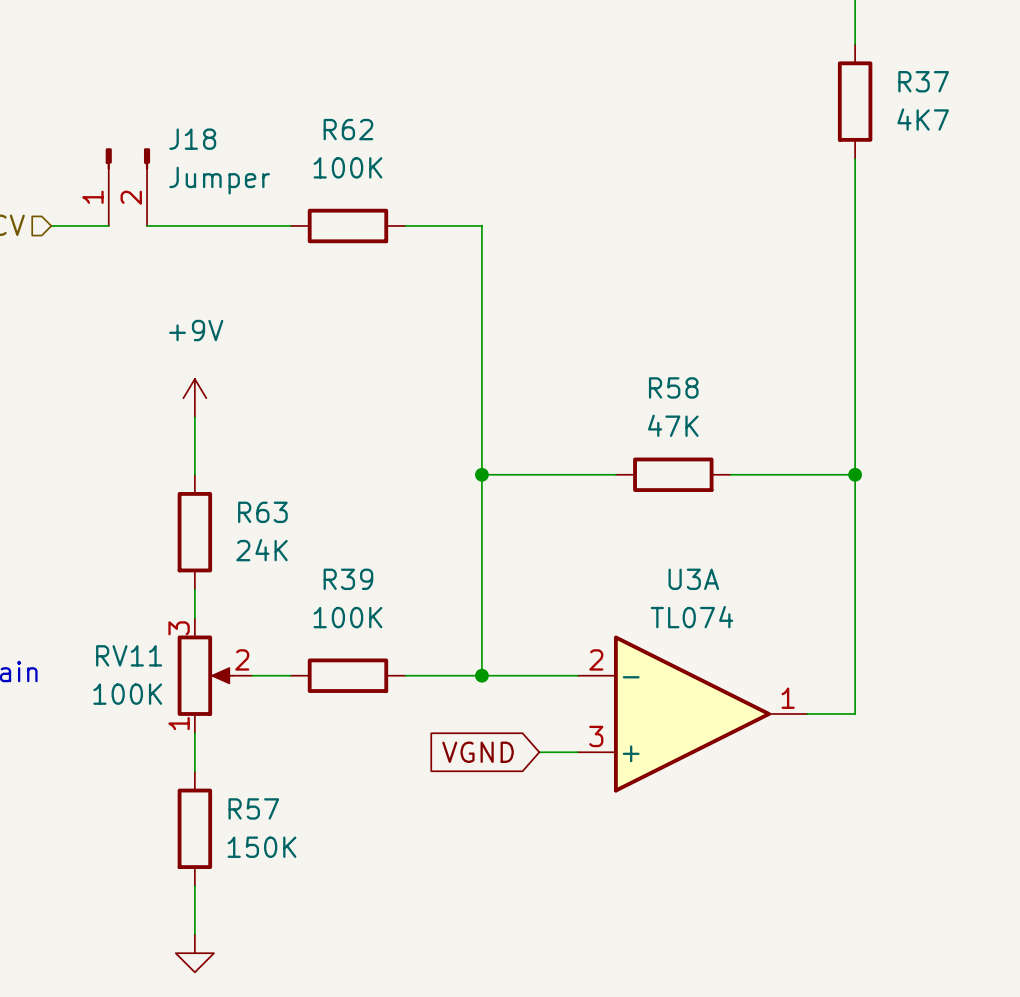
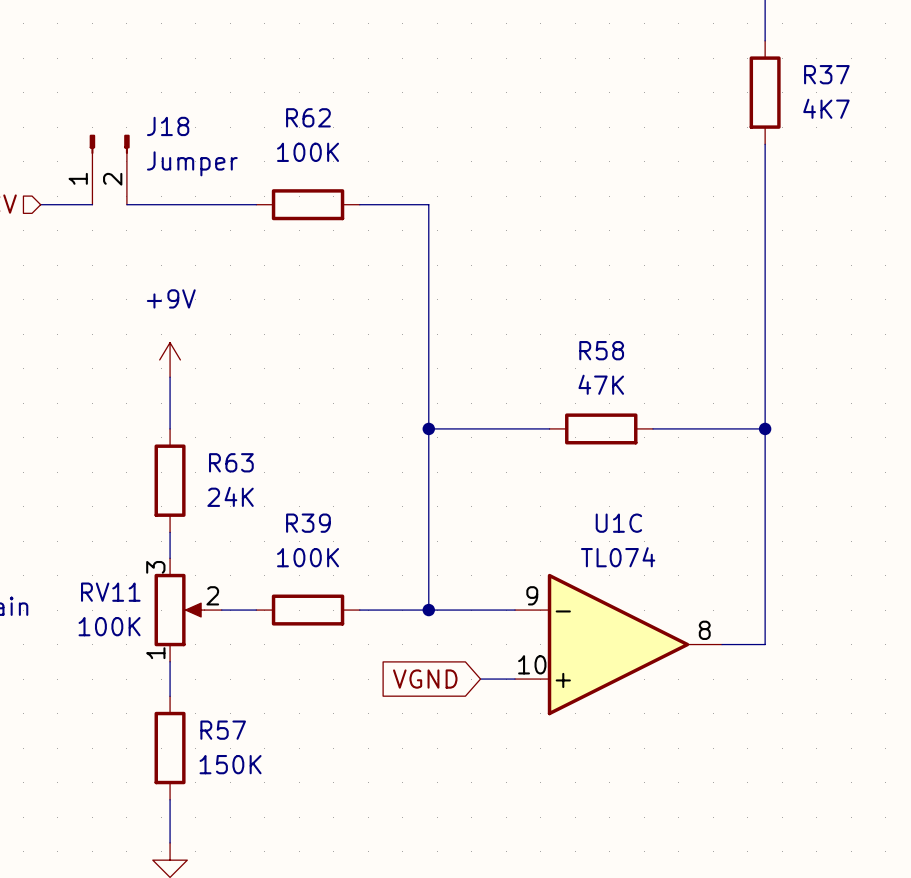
U3A name: U3A (693, 579) -> U1C (618, 523)
U3A pin number: 2 (596, 659) -> 9 (532, 595)
U3A pin number: 1 (788, 698) -> 8 (704, 630)
U3A pin number: 3 (596, 736) -> 10 (532, 664)

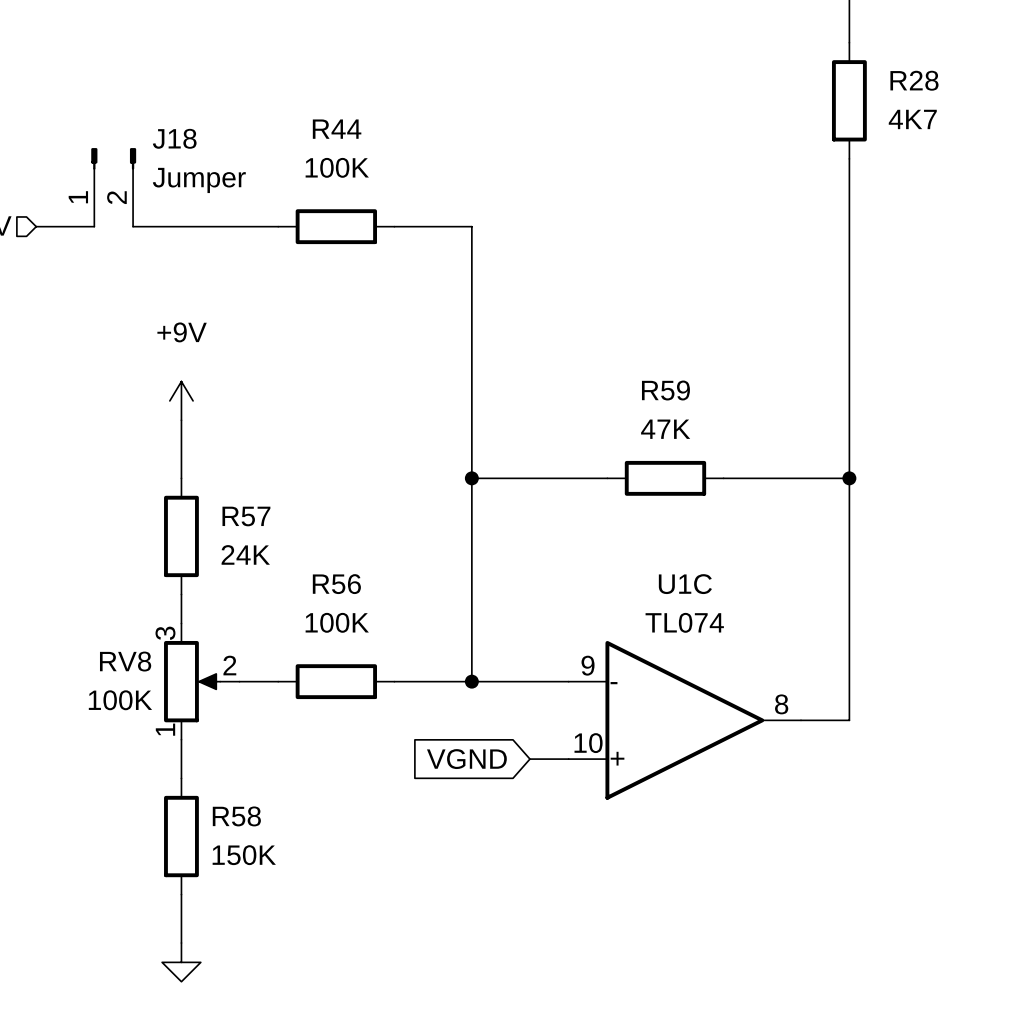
R37 name: R37 (826, 74) -> R28 (914, 80)
R62 name: R62 (308, 117) -> R44 (337, 129)
R58 name: R58 (601, 350) -> R59 (665, 390)
R63 name: R63 (231, 462) -> R57 (246, 516)
R39 name: R39 (308, 523) -> R56 (336, 584)
RV11 name: RV11 (110, 592) -> RV8 (125, 661)
R57 name: R57 (223, 730) -> R58 (236, 816)

